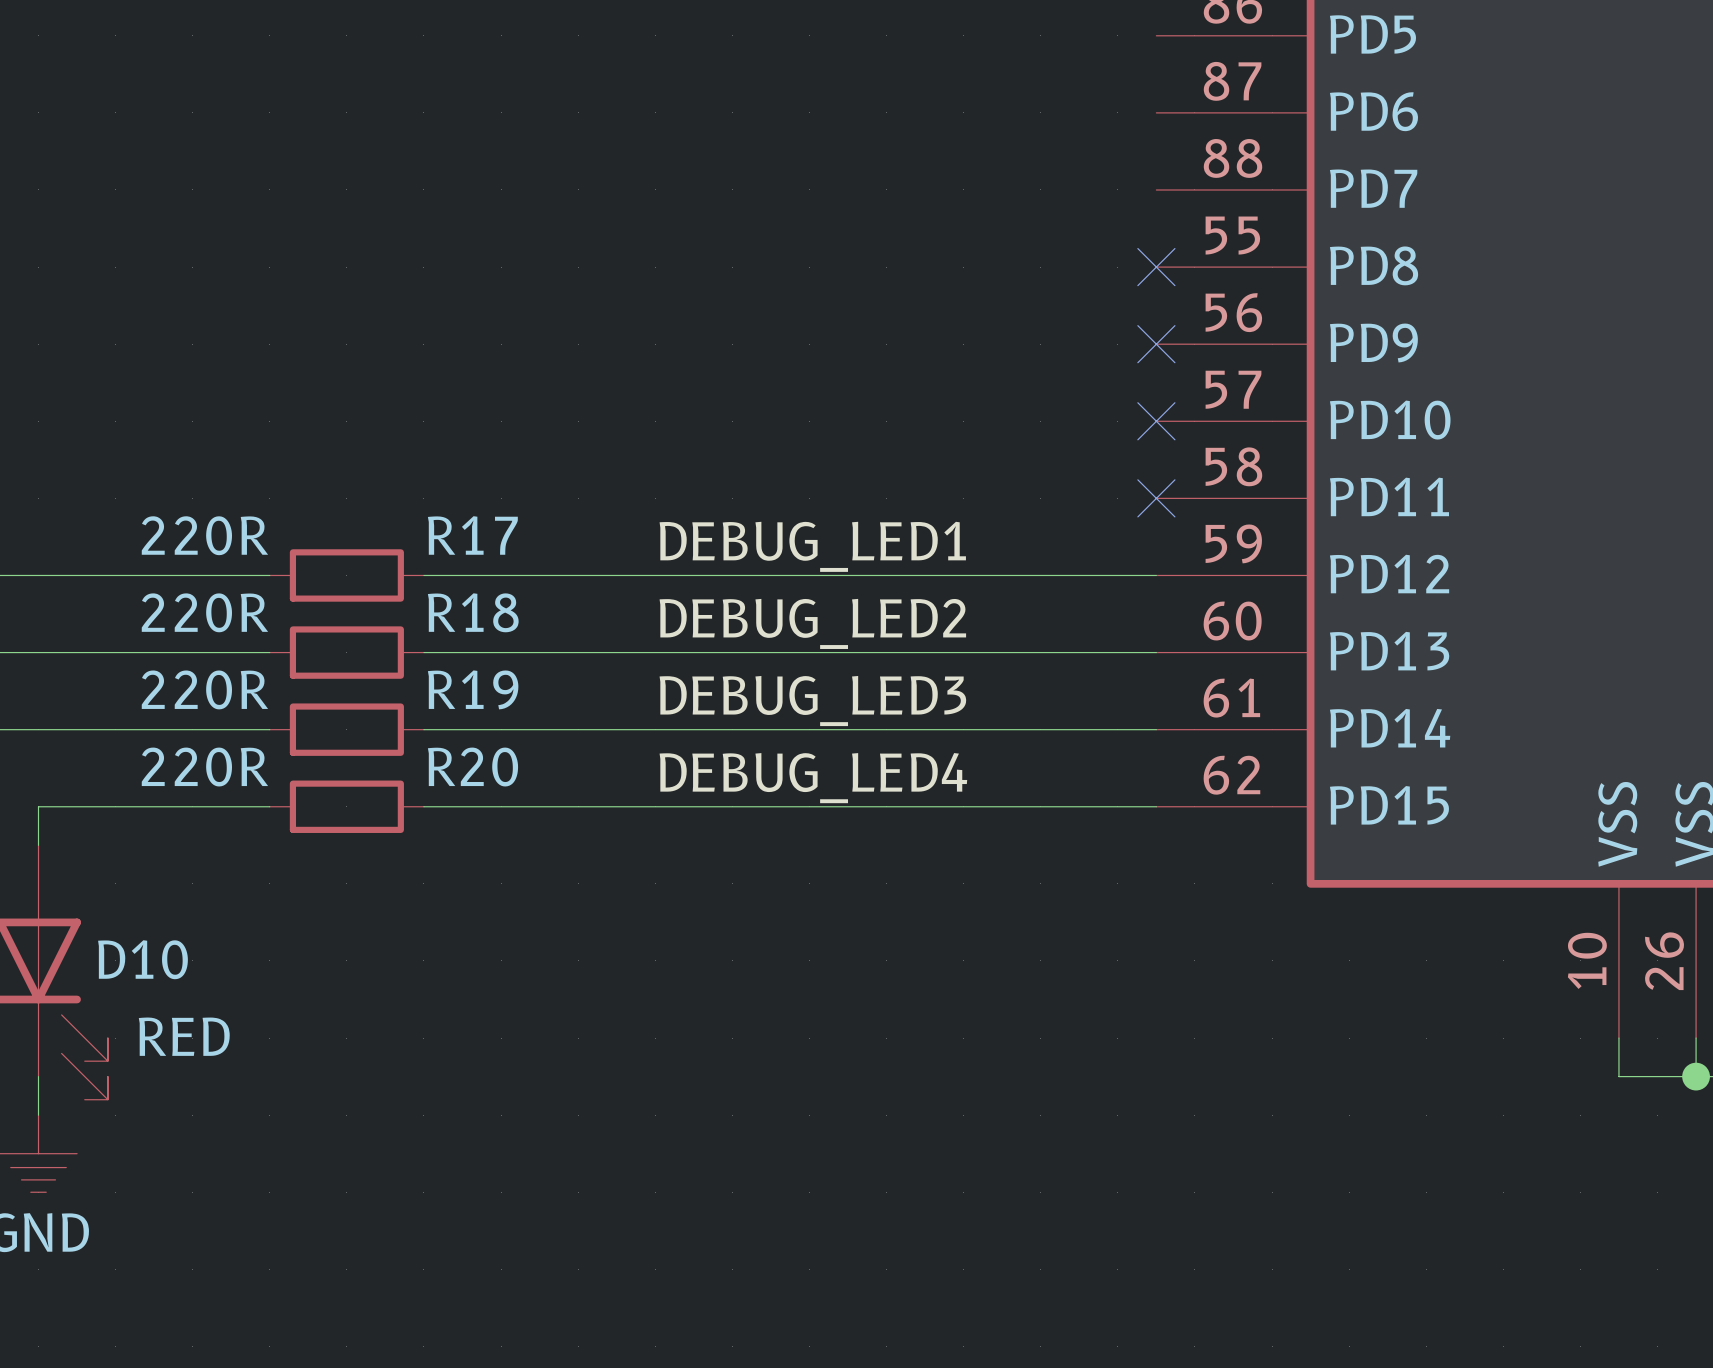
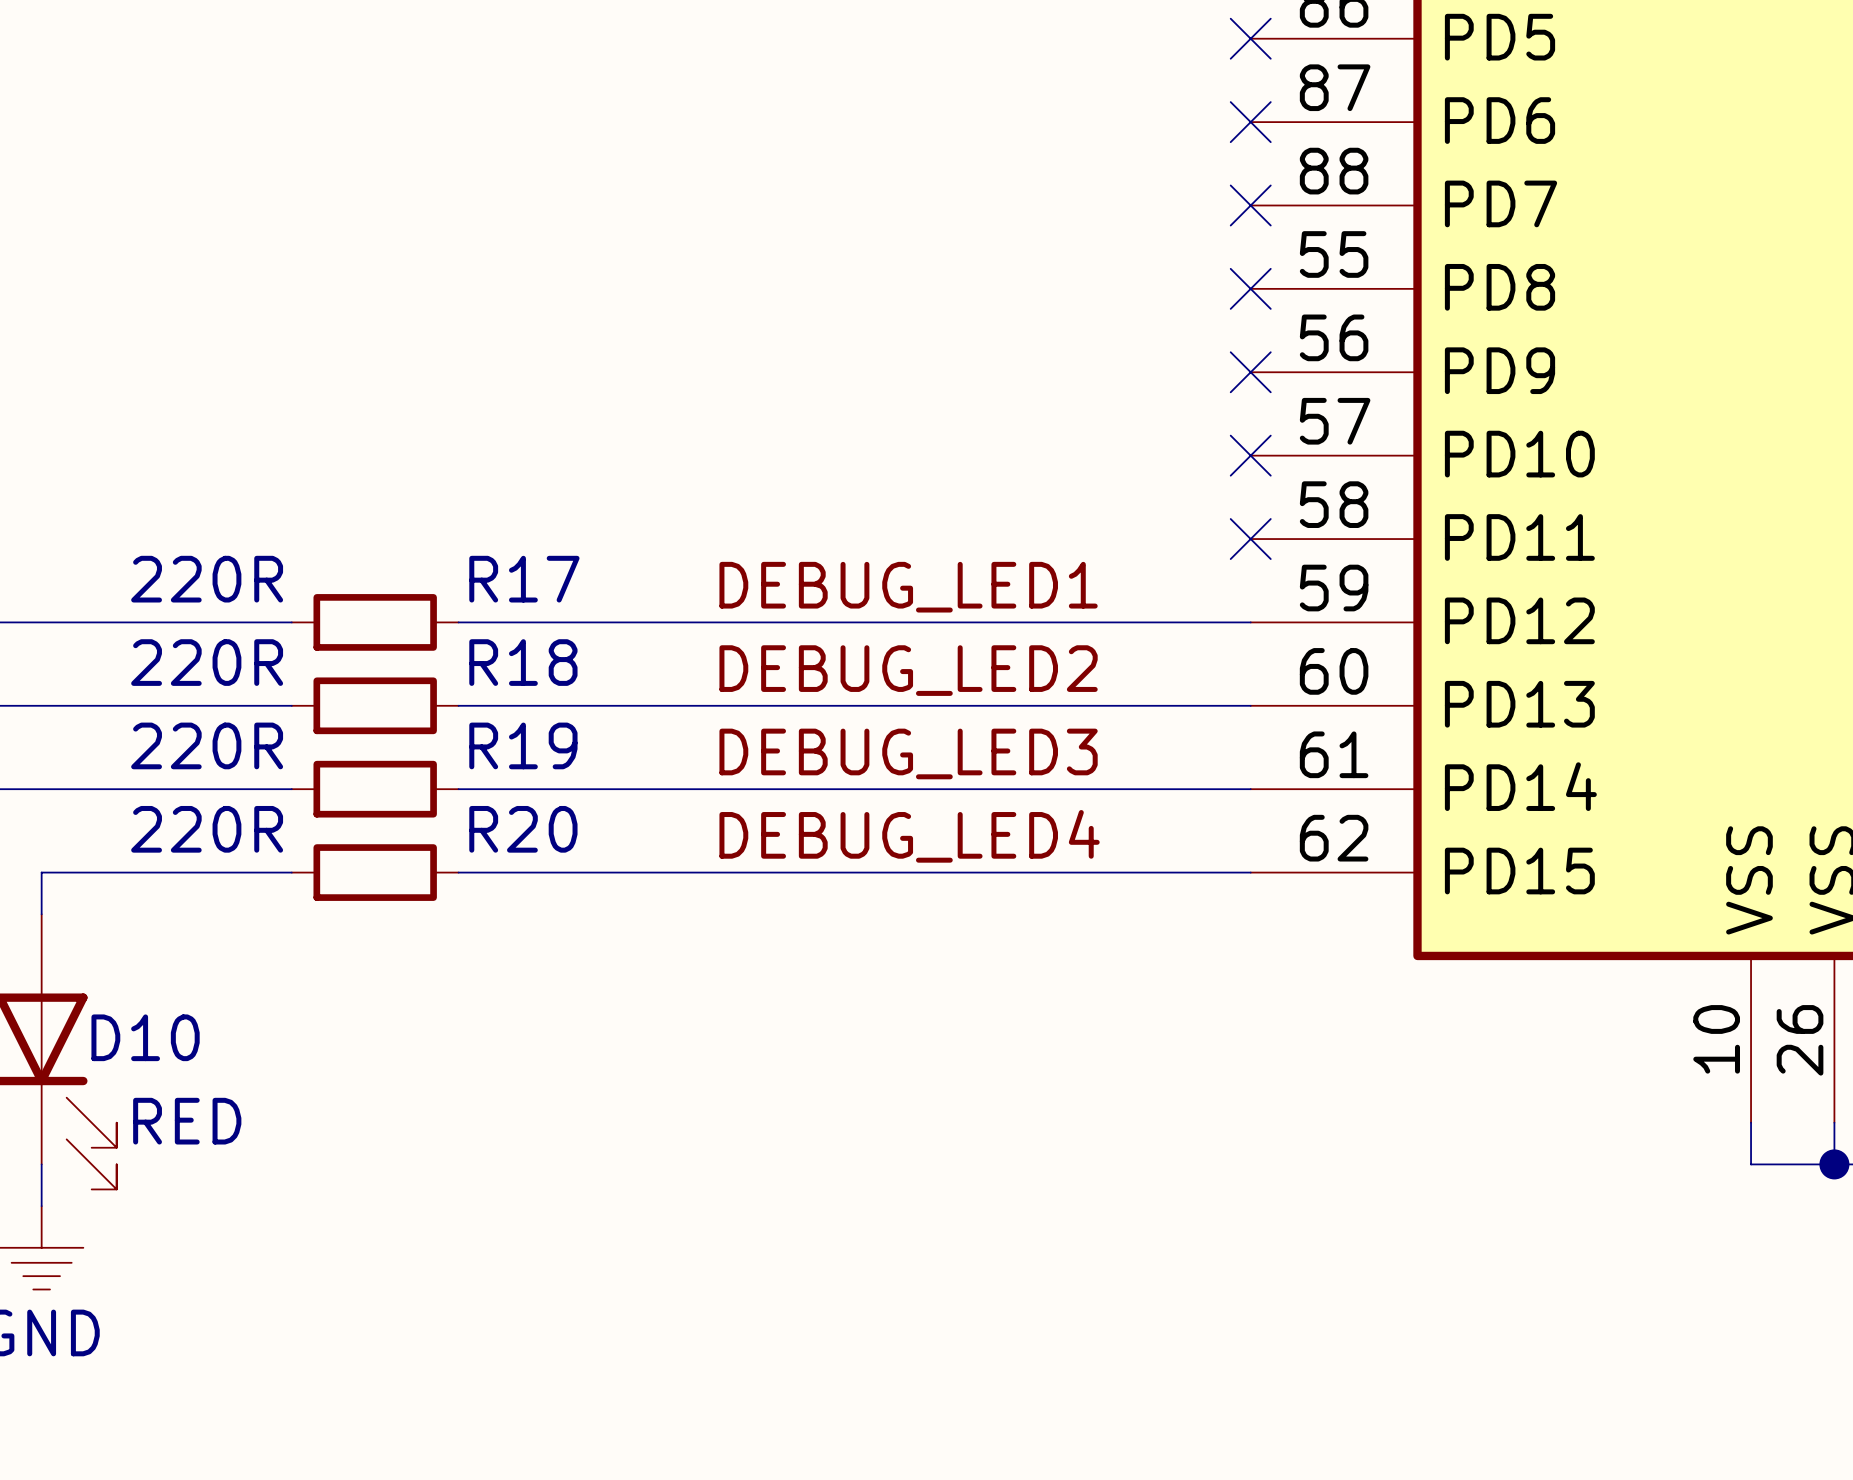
no-connect mark: none -> (1250, 38)
no-connect mark: none -> (1250, 122)
no-connect mark: none -> (1250, 205)

